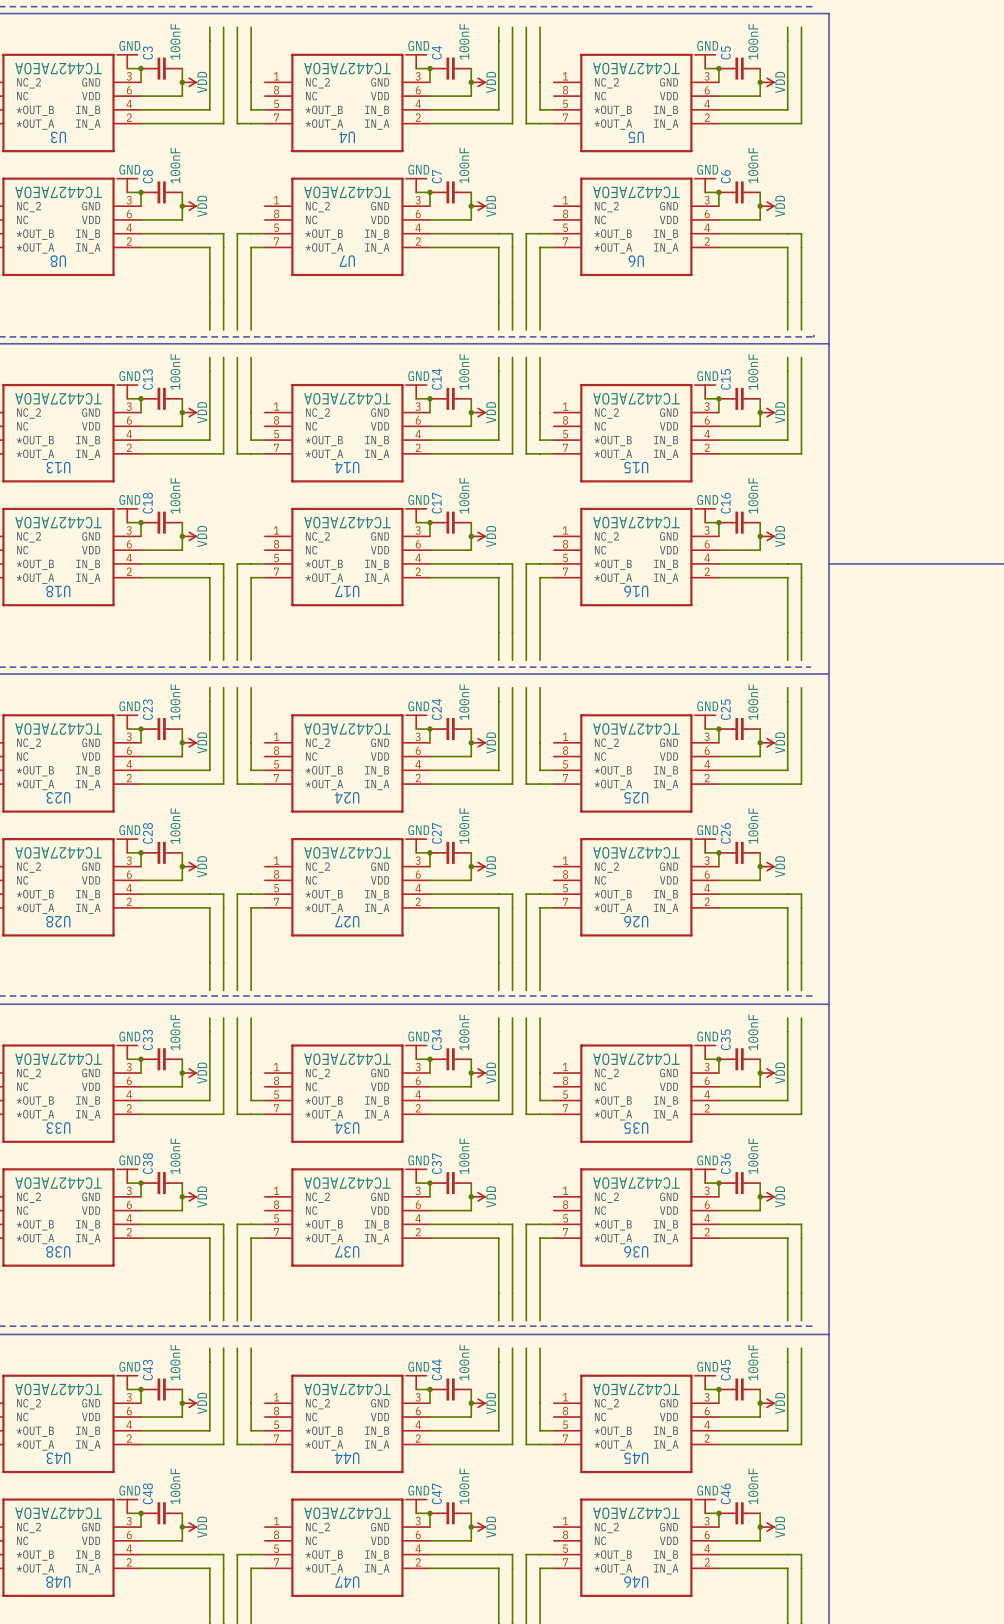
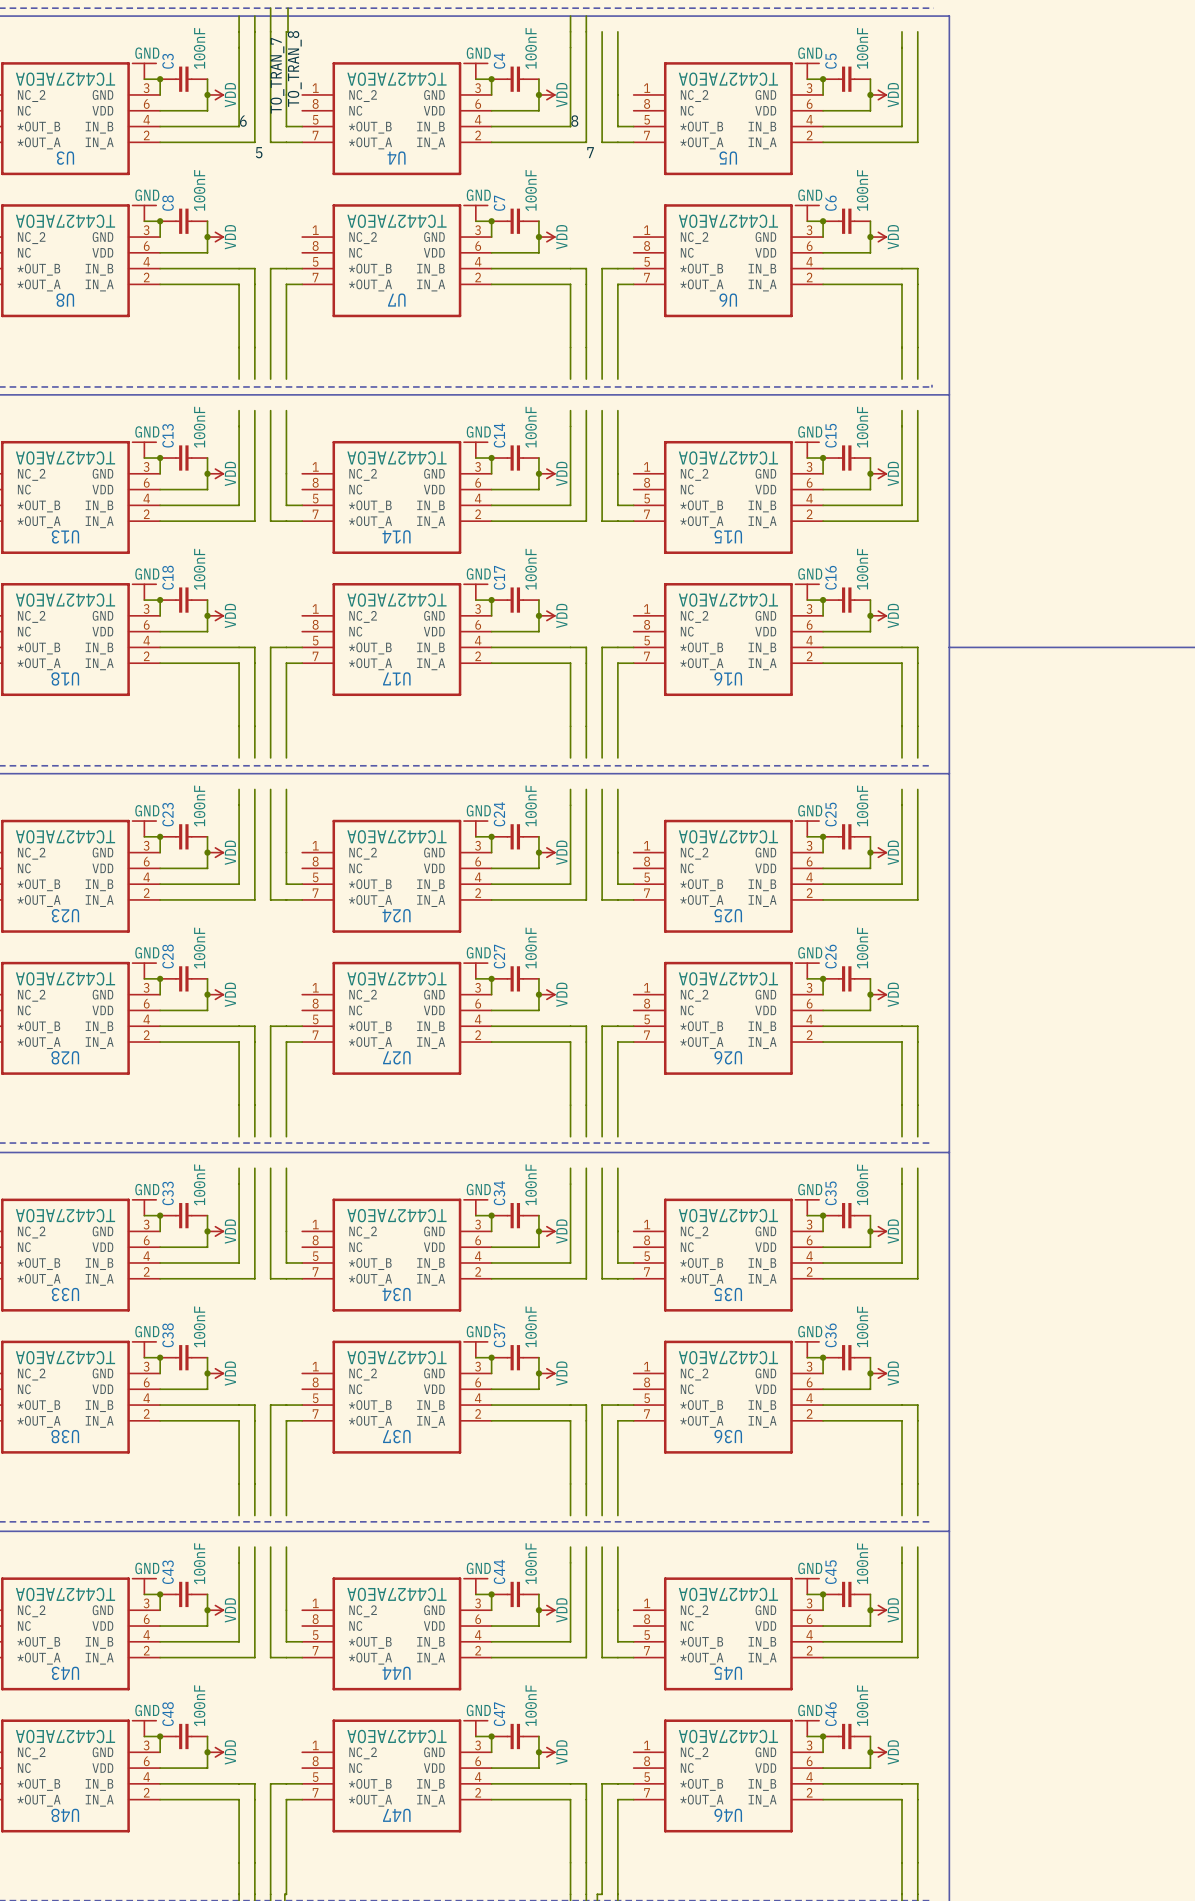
wire: none -> (270, 8) (270, 31)
wire: none -> (288, 8) (288, 31) (286, 31)
wire: none -> (239, 16) (239, 31)
wire: none -> (254, 16) (254, 31)
wire: none -> (570, 16) (570, 31)
wire: none -> (586, 16) (586, 31)
label: none -> TO_TRAN_8 (294, 68)
label: none -> TO_TRAN_7 (277, 75)
label: none -> 6 (243, 121)
label: none -> 8 (574, 121)
label: none -> 5 (259, 152)
label: none -> 7 (590, 152)

